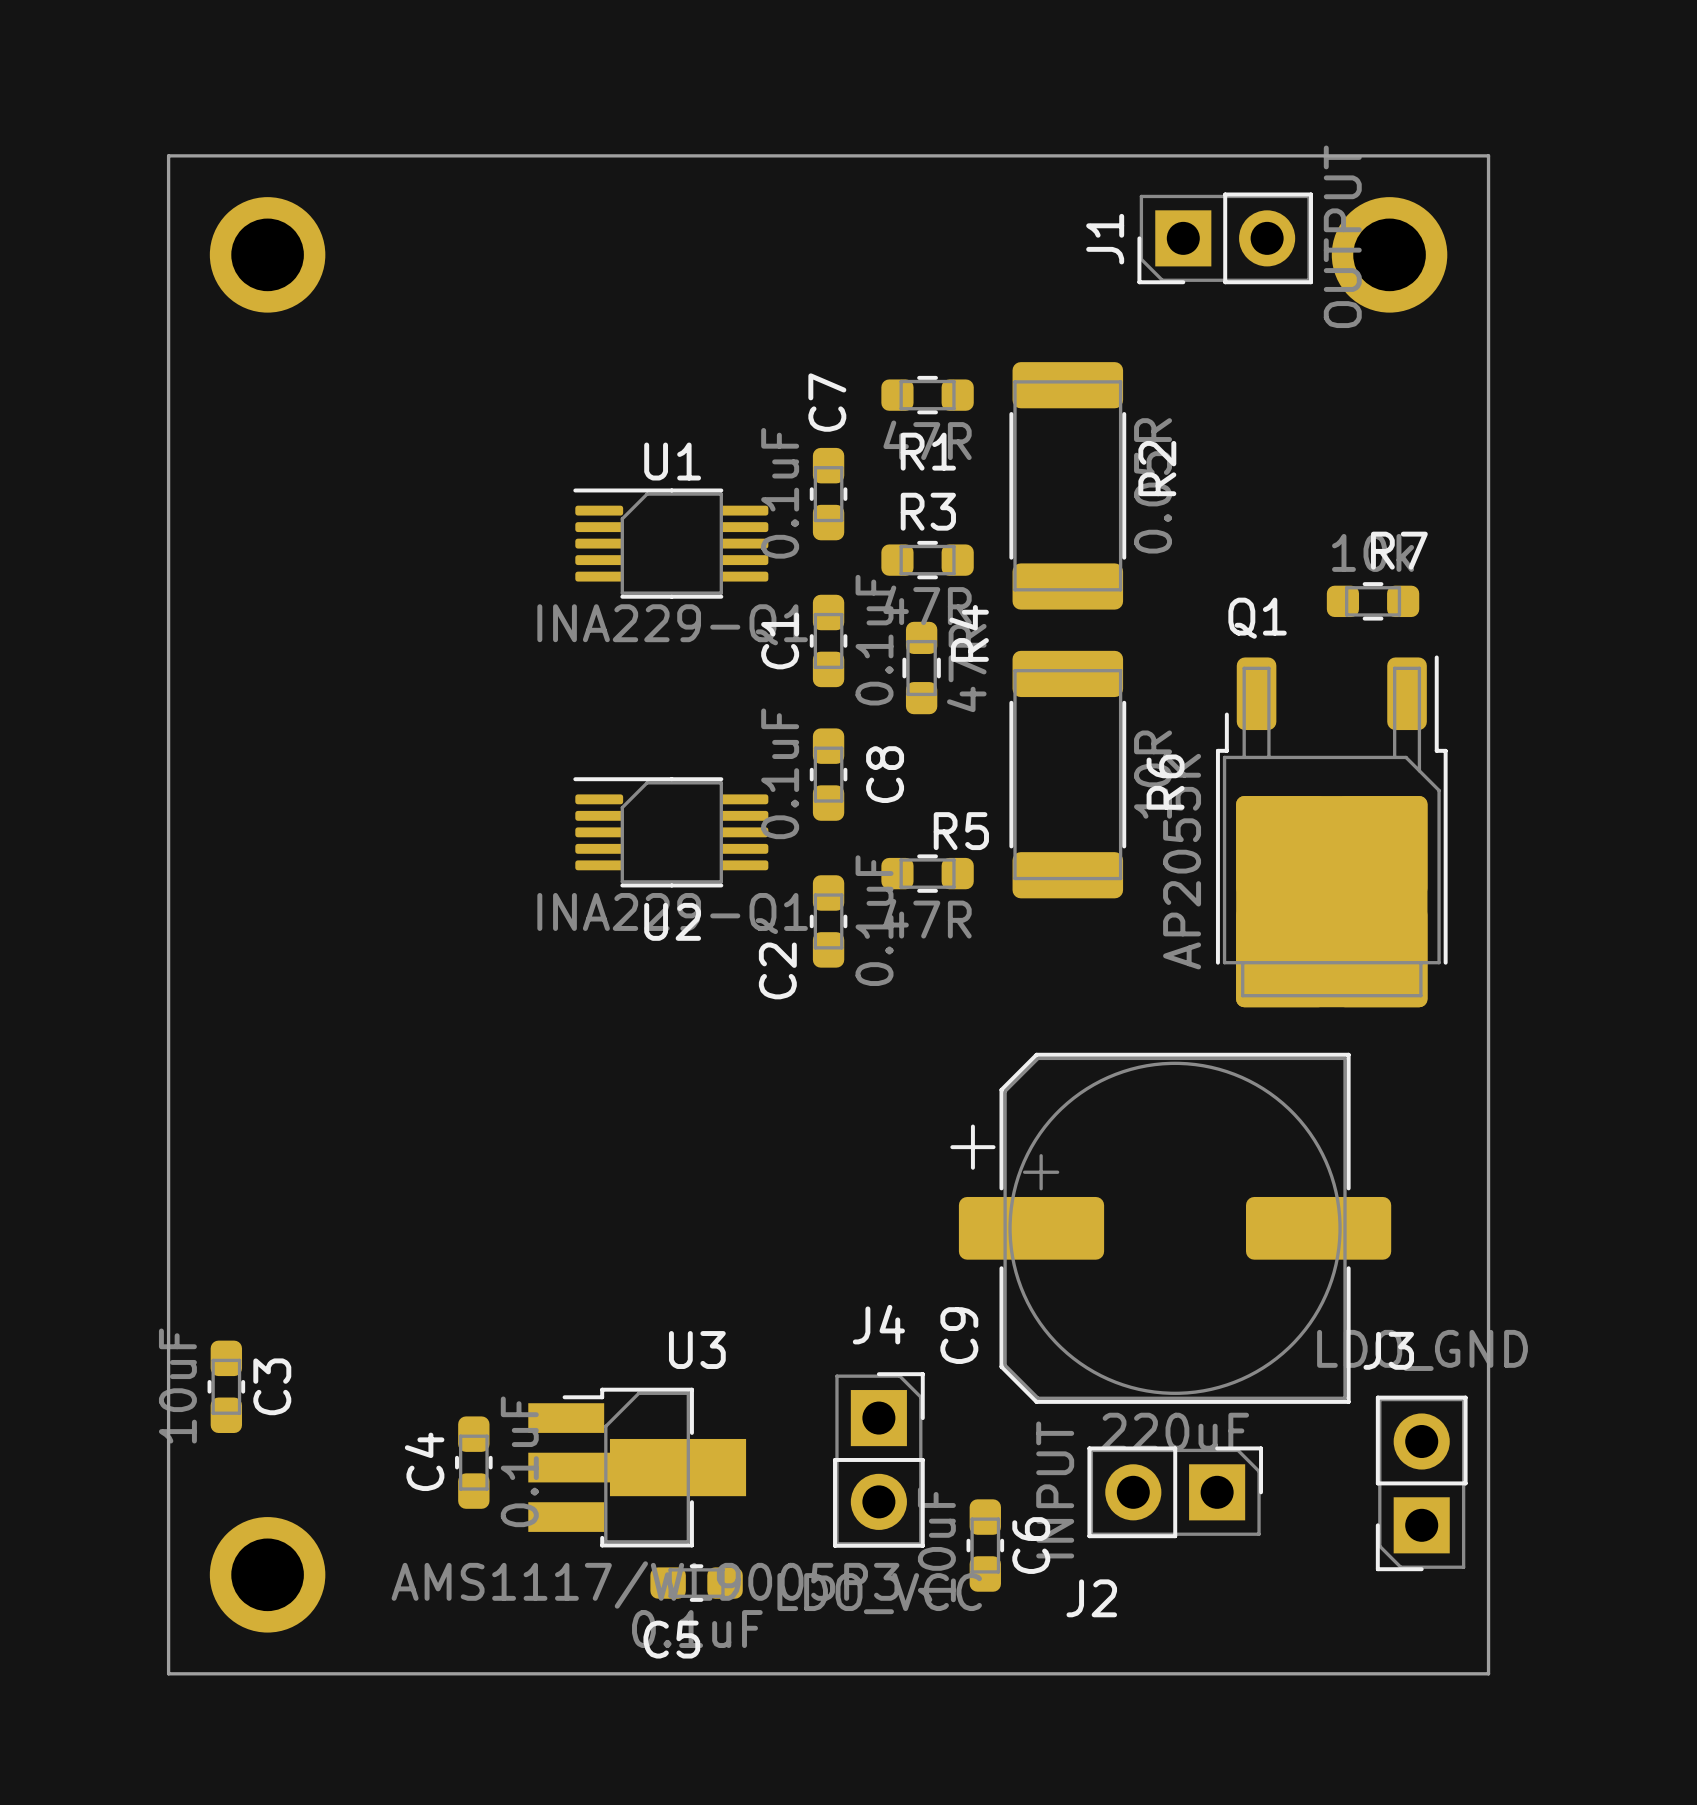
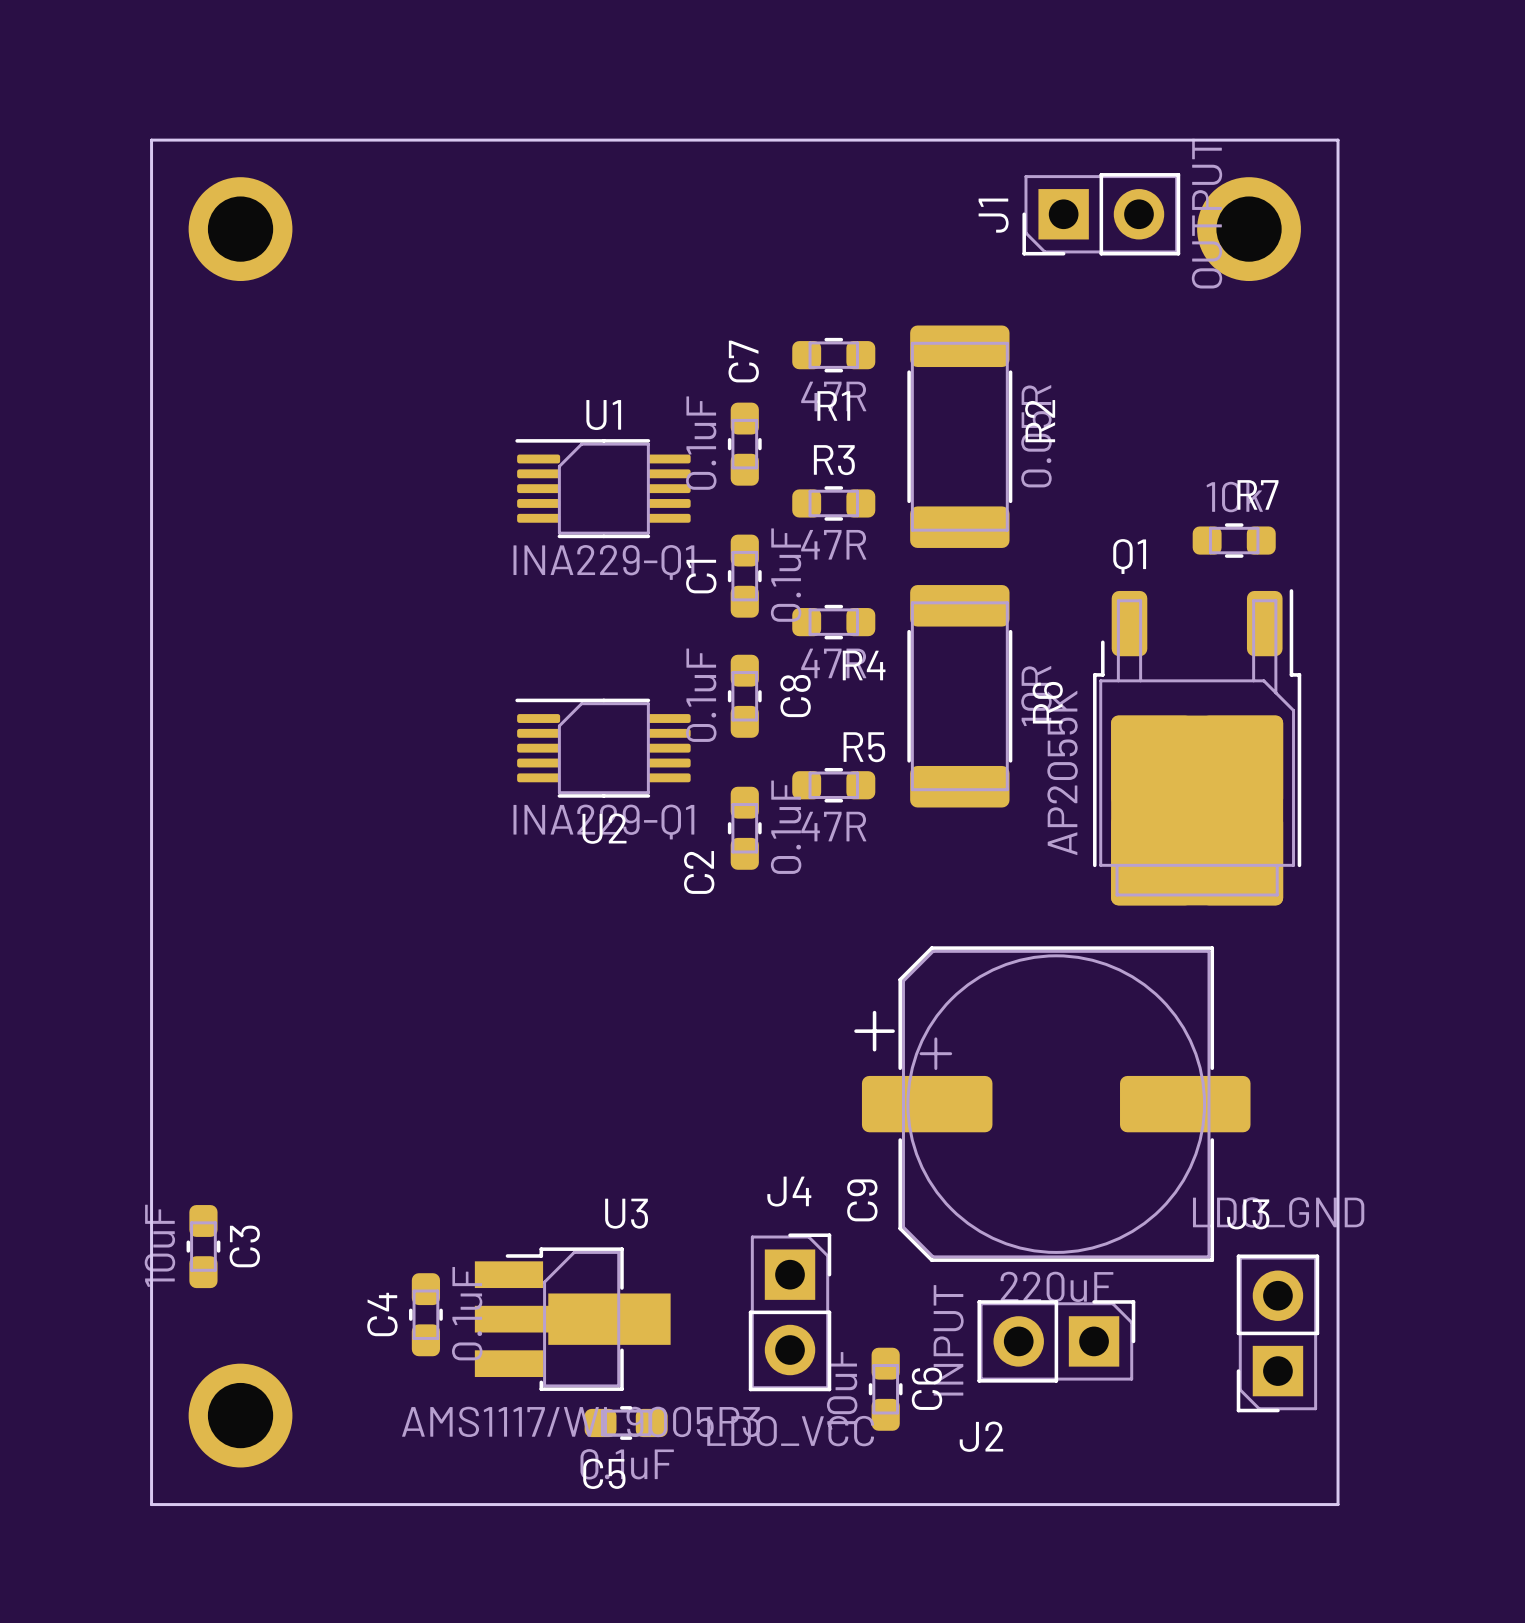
R4 rotation: 0° (921, 668) -> 90° clockwise (833, 622)

